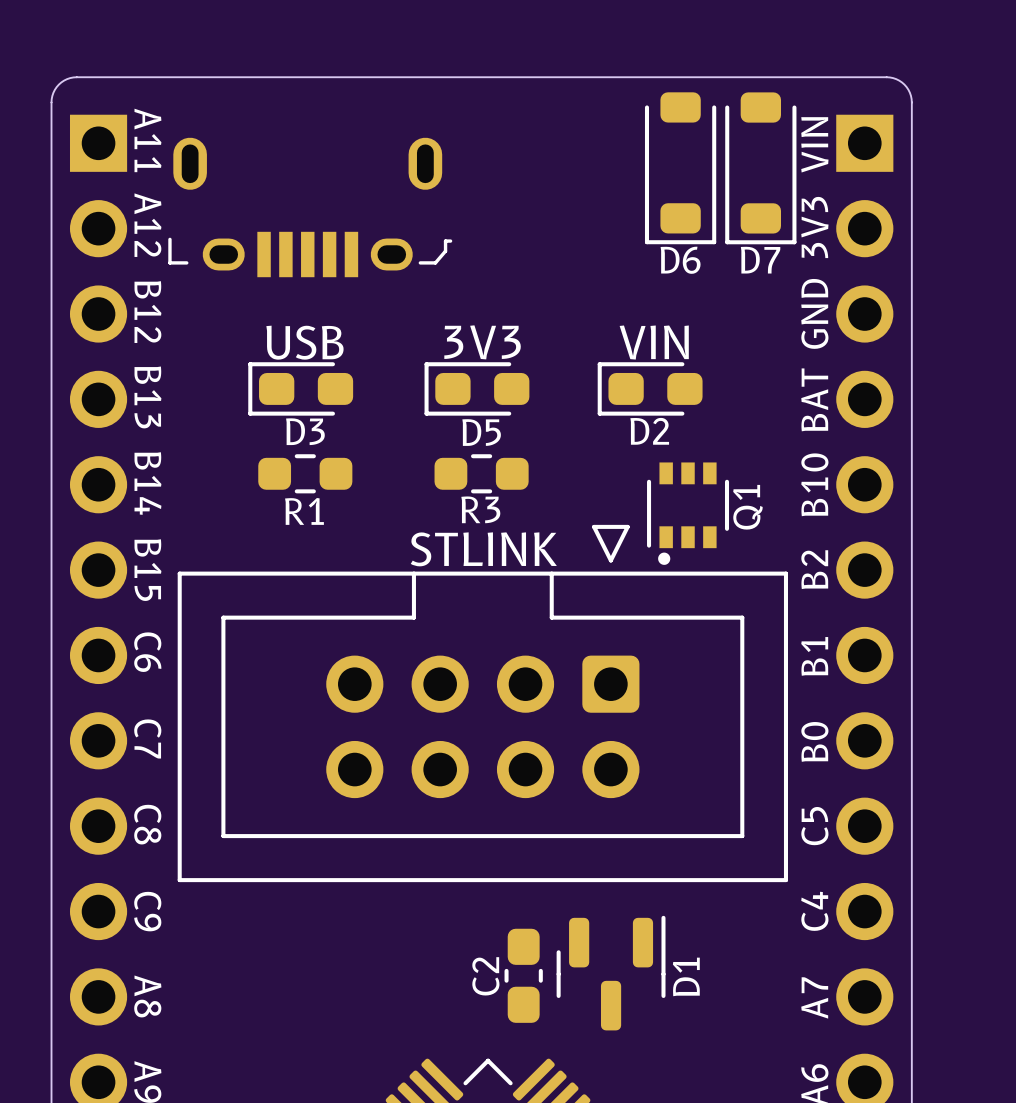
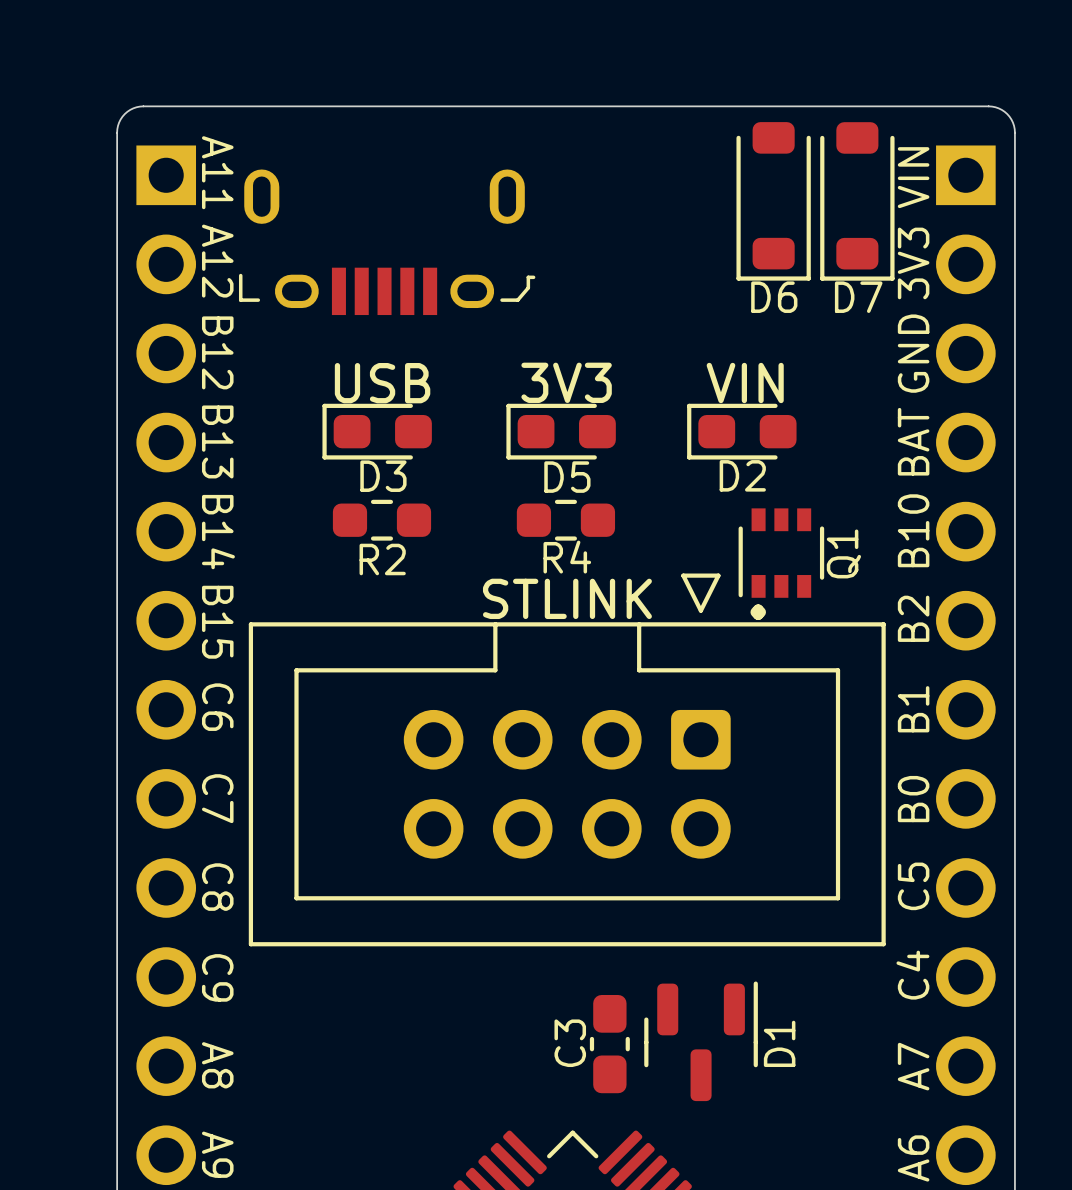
R3 name: R3 (480, 509) -> R4 (567, 557)
R1 name: R1 (304, 511) -> R2 (382, 559)
C2 name: C2 (485, 976) -> C3 (570, 1043)

